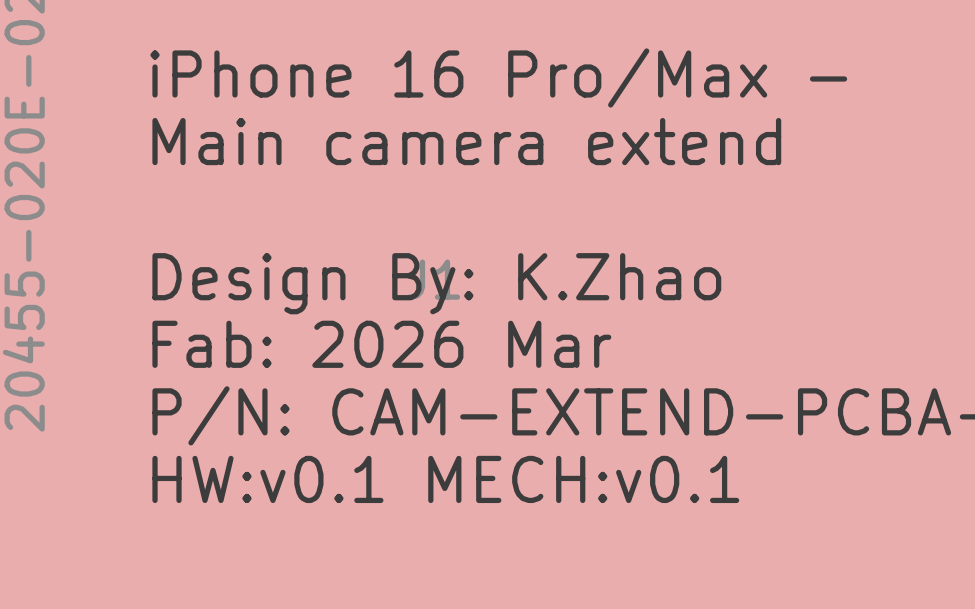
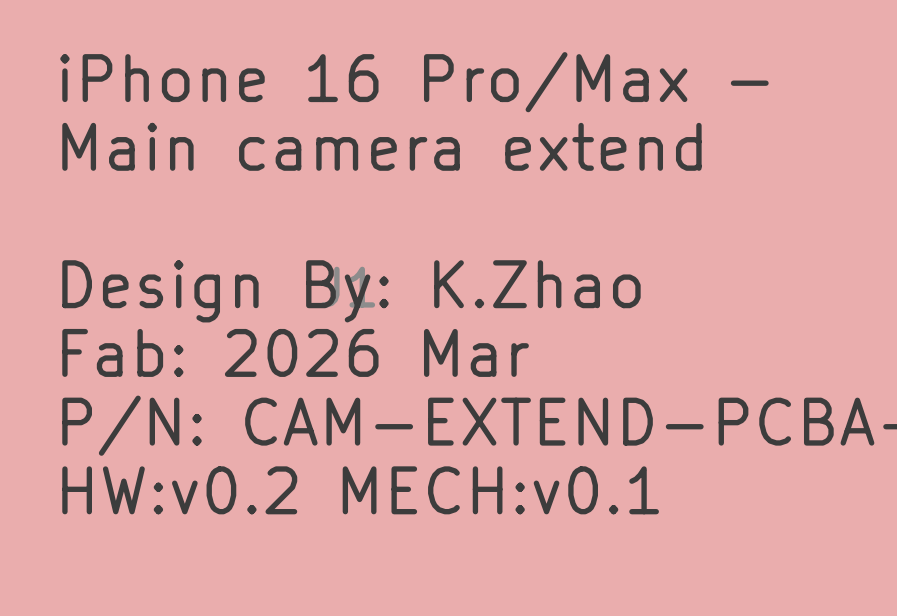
text: HW:v0.1 MECH:v0.1 (445, 479) -> HW:v0.2 MECH:v0.1 (360, 490)

